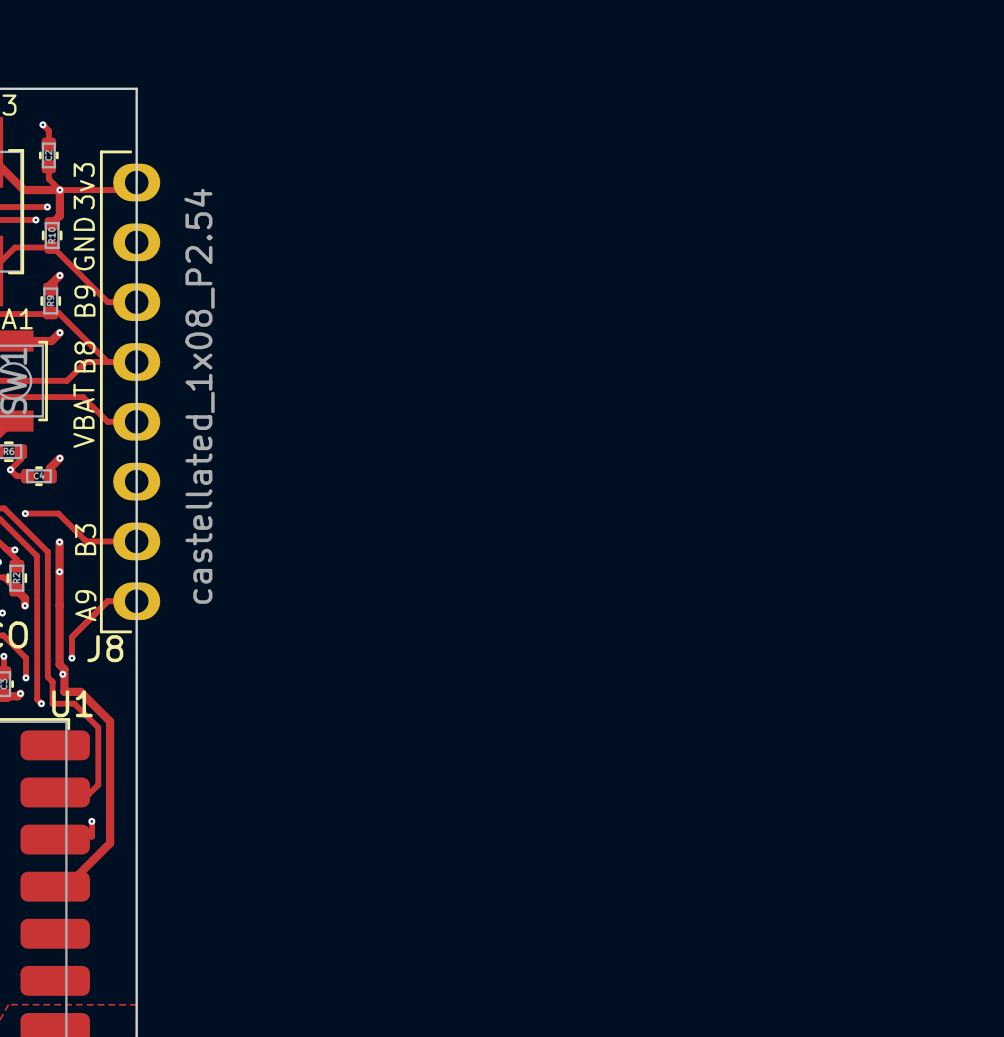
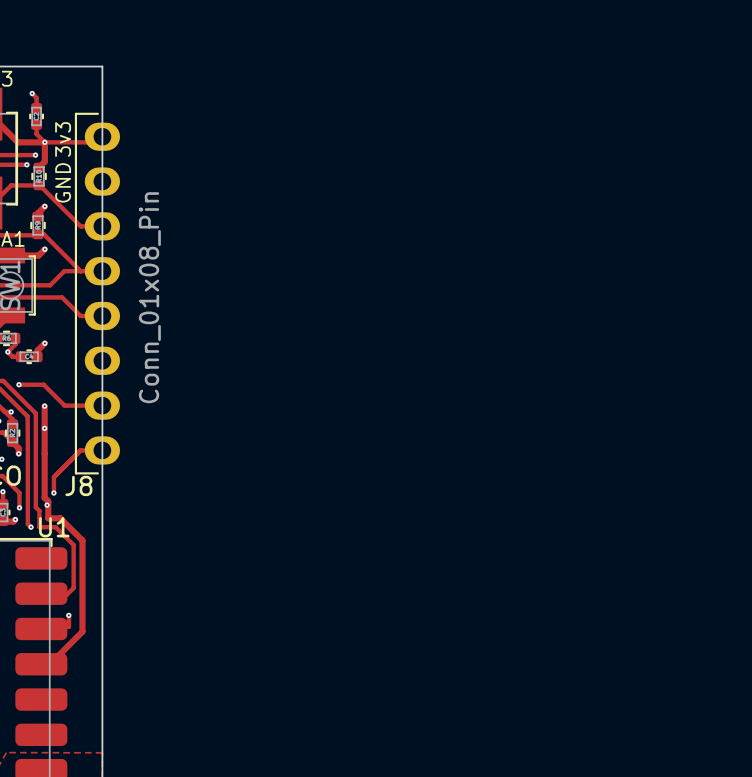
text: B9 (84, 301) -> none
text: B8 (84, 356) -> none
J8 value: castellated_1x08_P2.54 (199, 396) -> Conn_01x08_Pin (149, 297)
text: VBAT (83, 415) -> none
text: B3 (85, 539) -> none
text: A9 (85, 605) -> none

